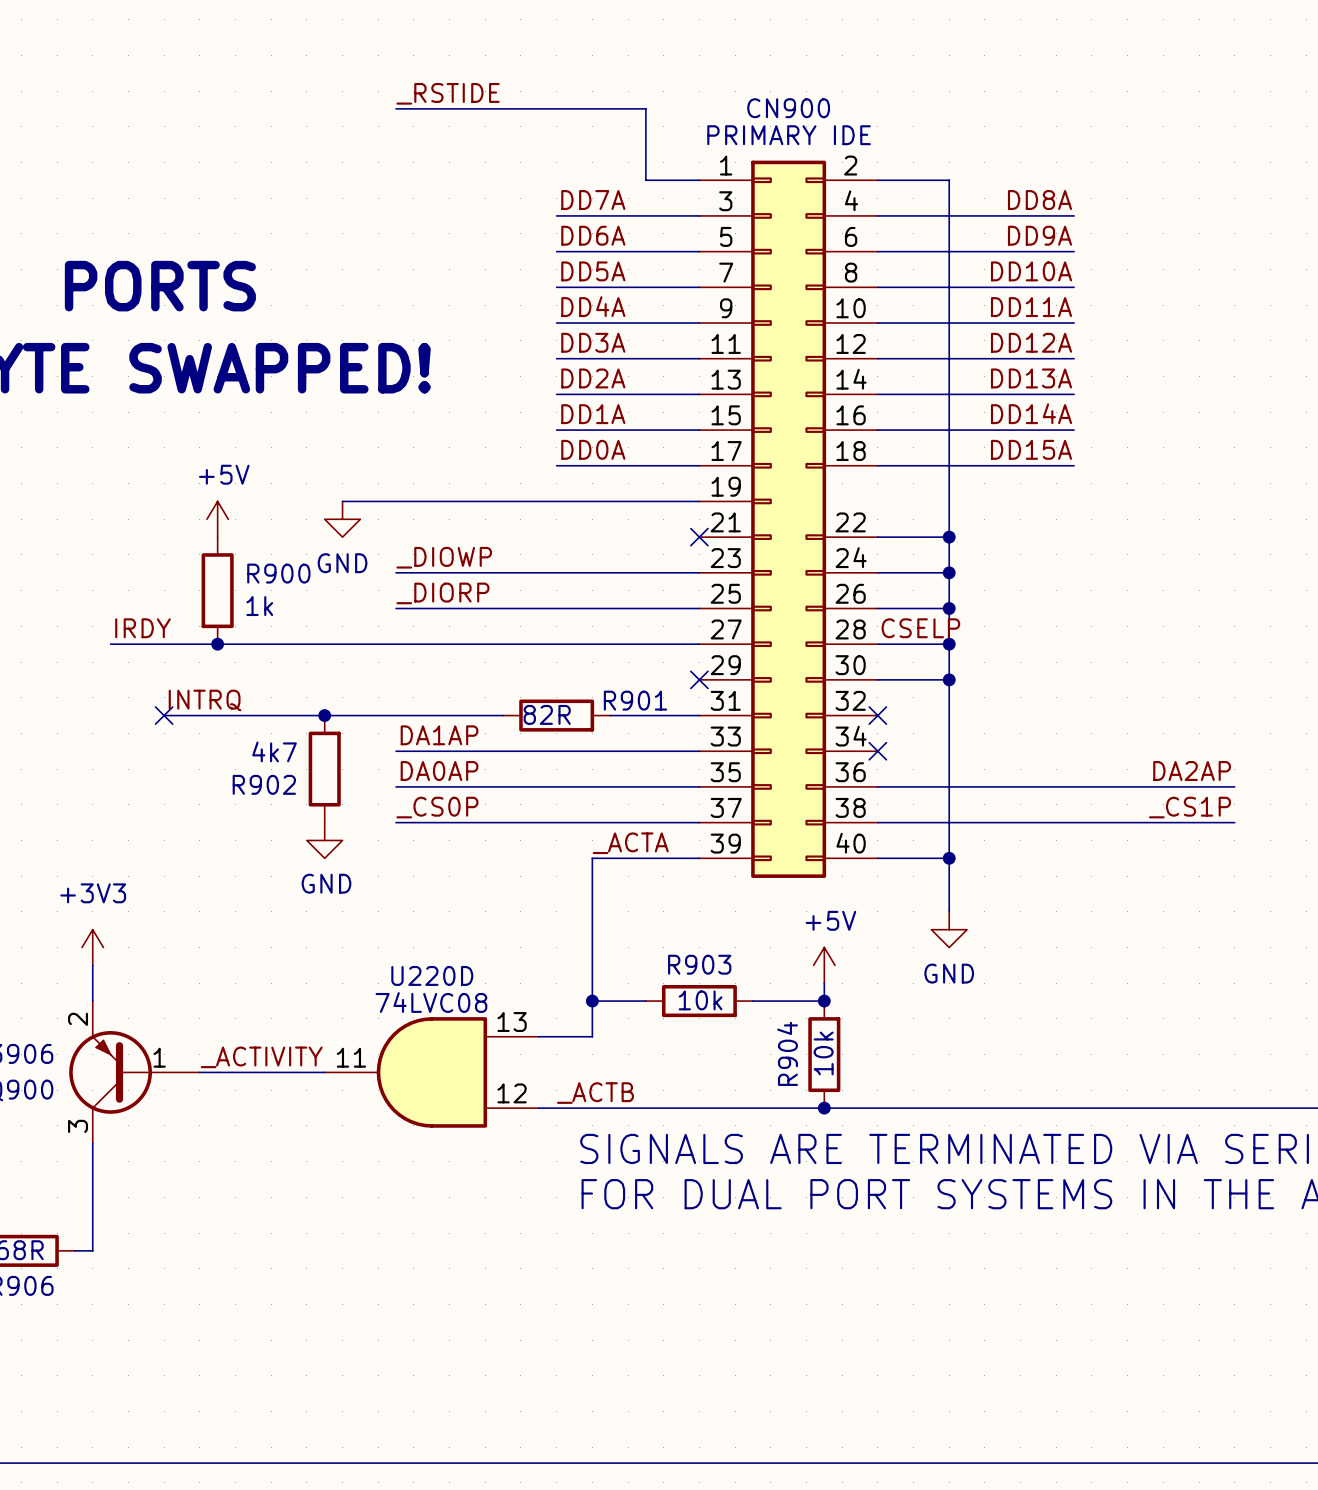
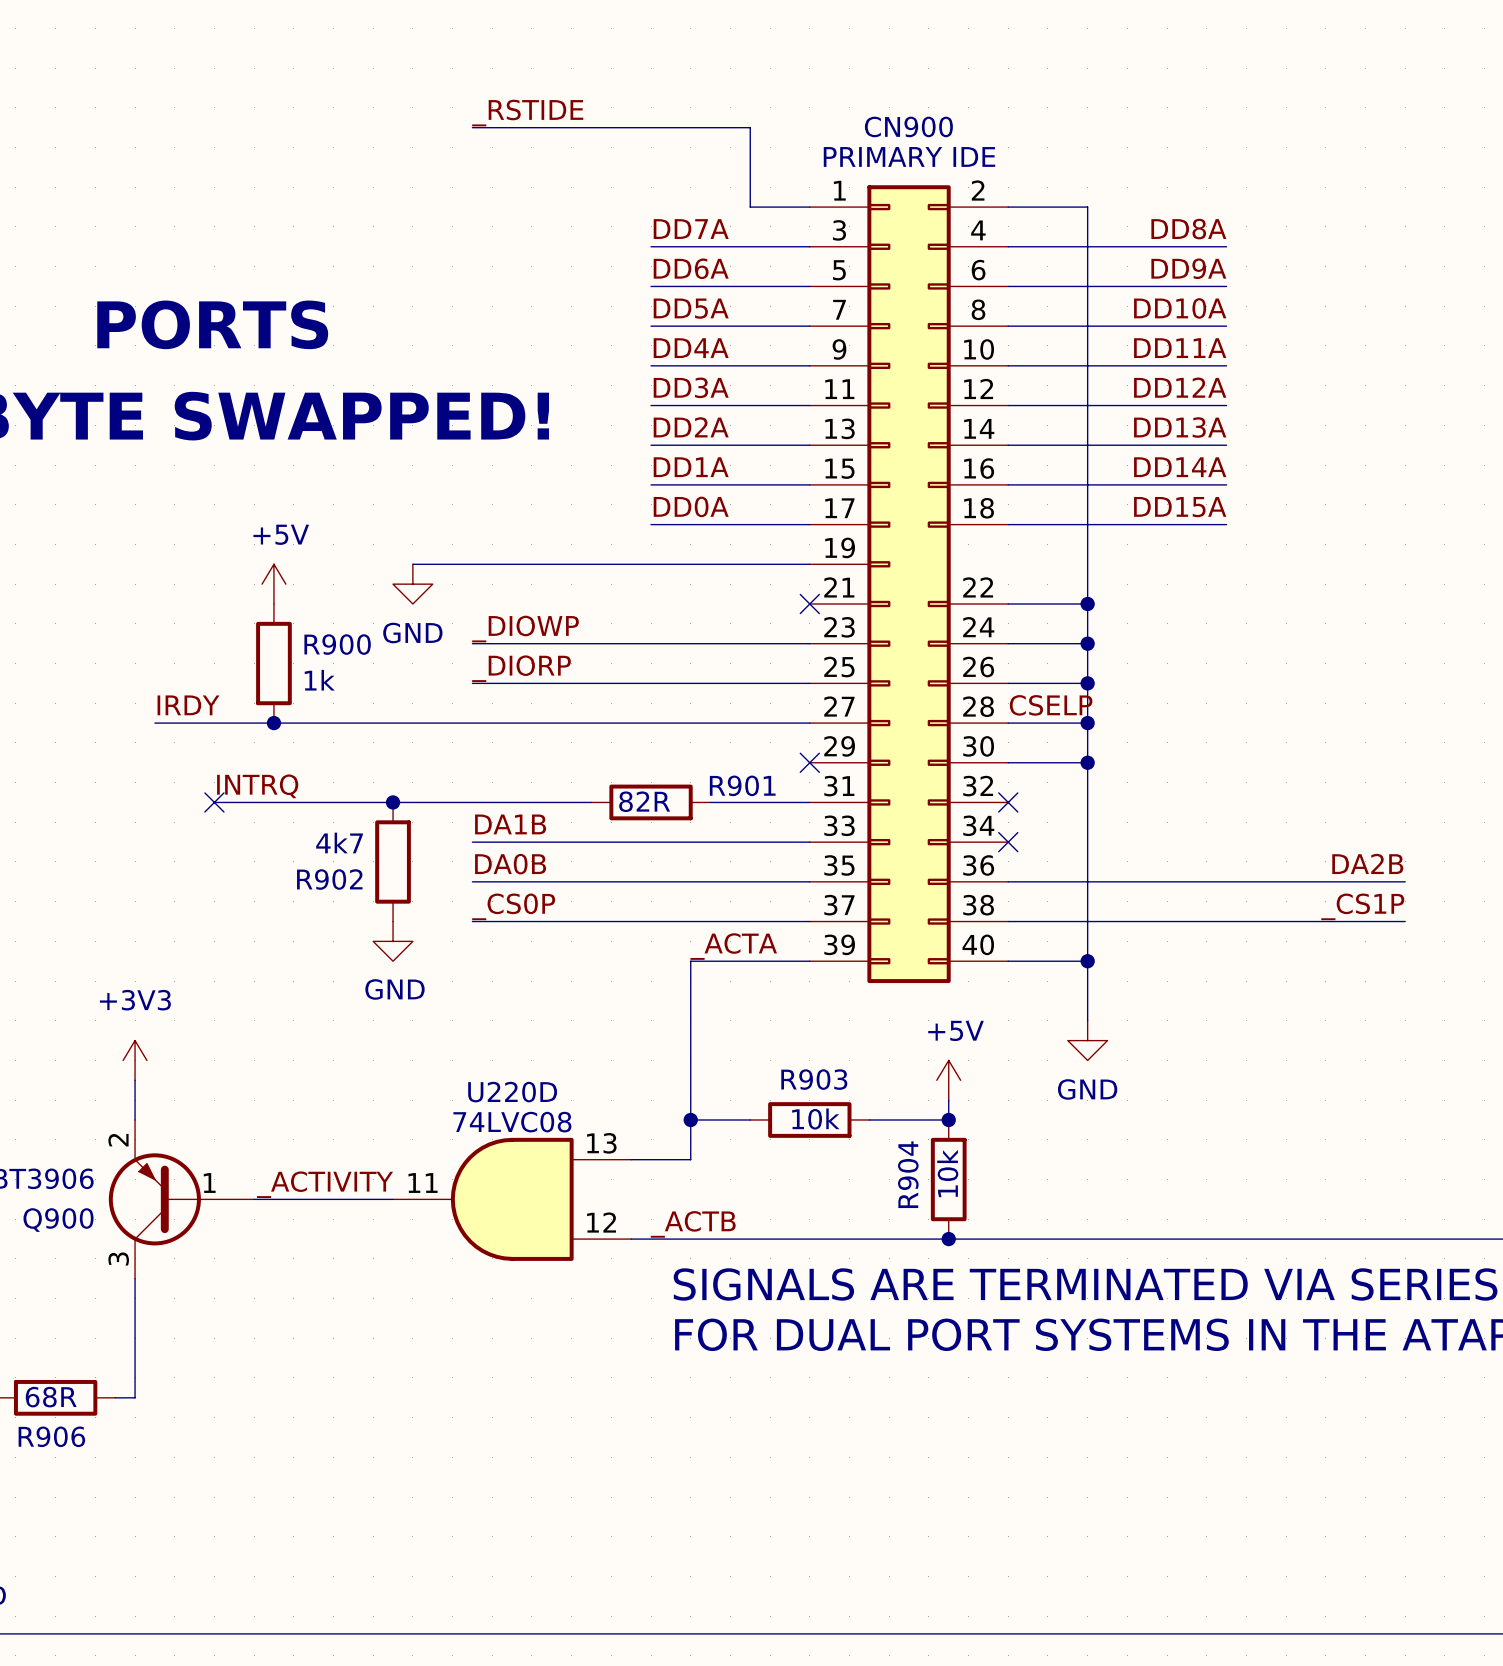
label: DA1AP (439, 735) -> DA1B (510, 824)
label: DA0AP (439, 771) -> DA0B (510, 864)
label: DA2AP (1192, 771) -> DA2B (1367, 863)

